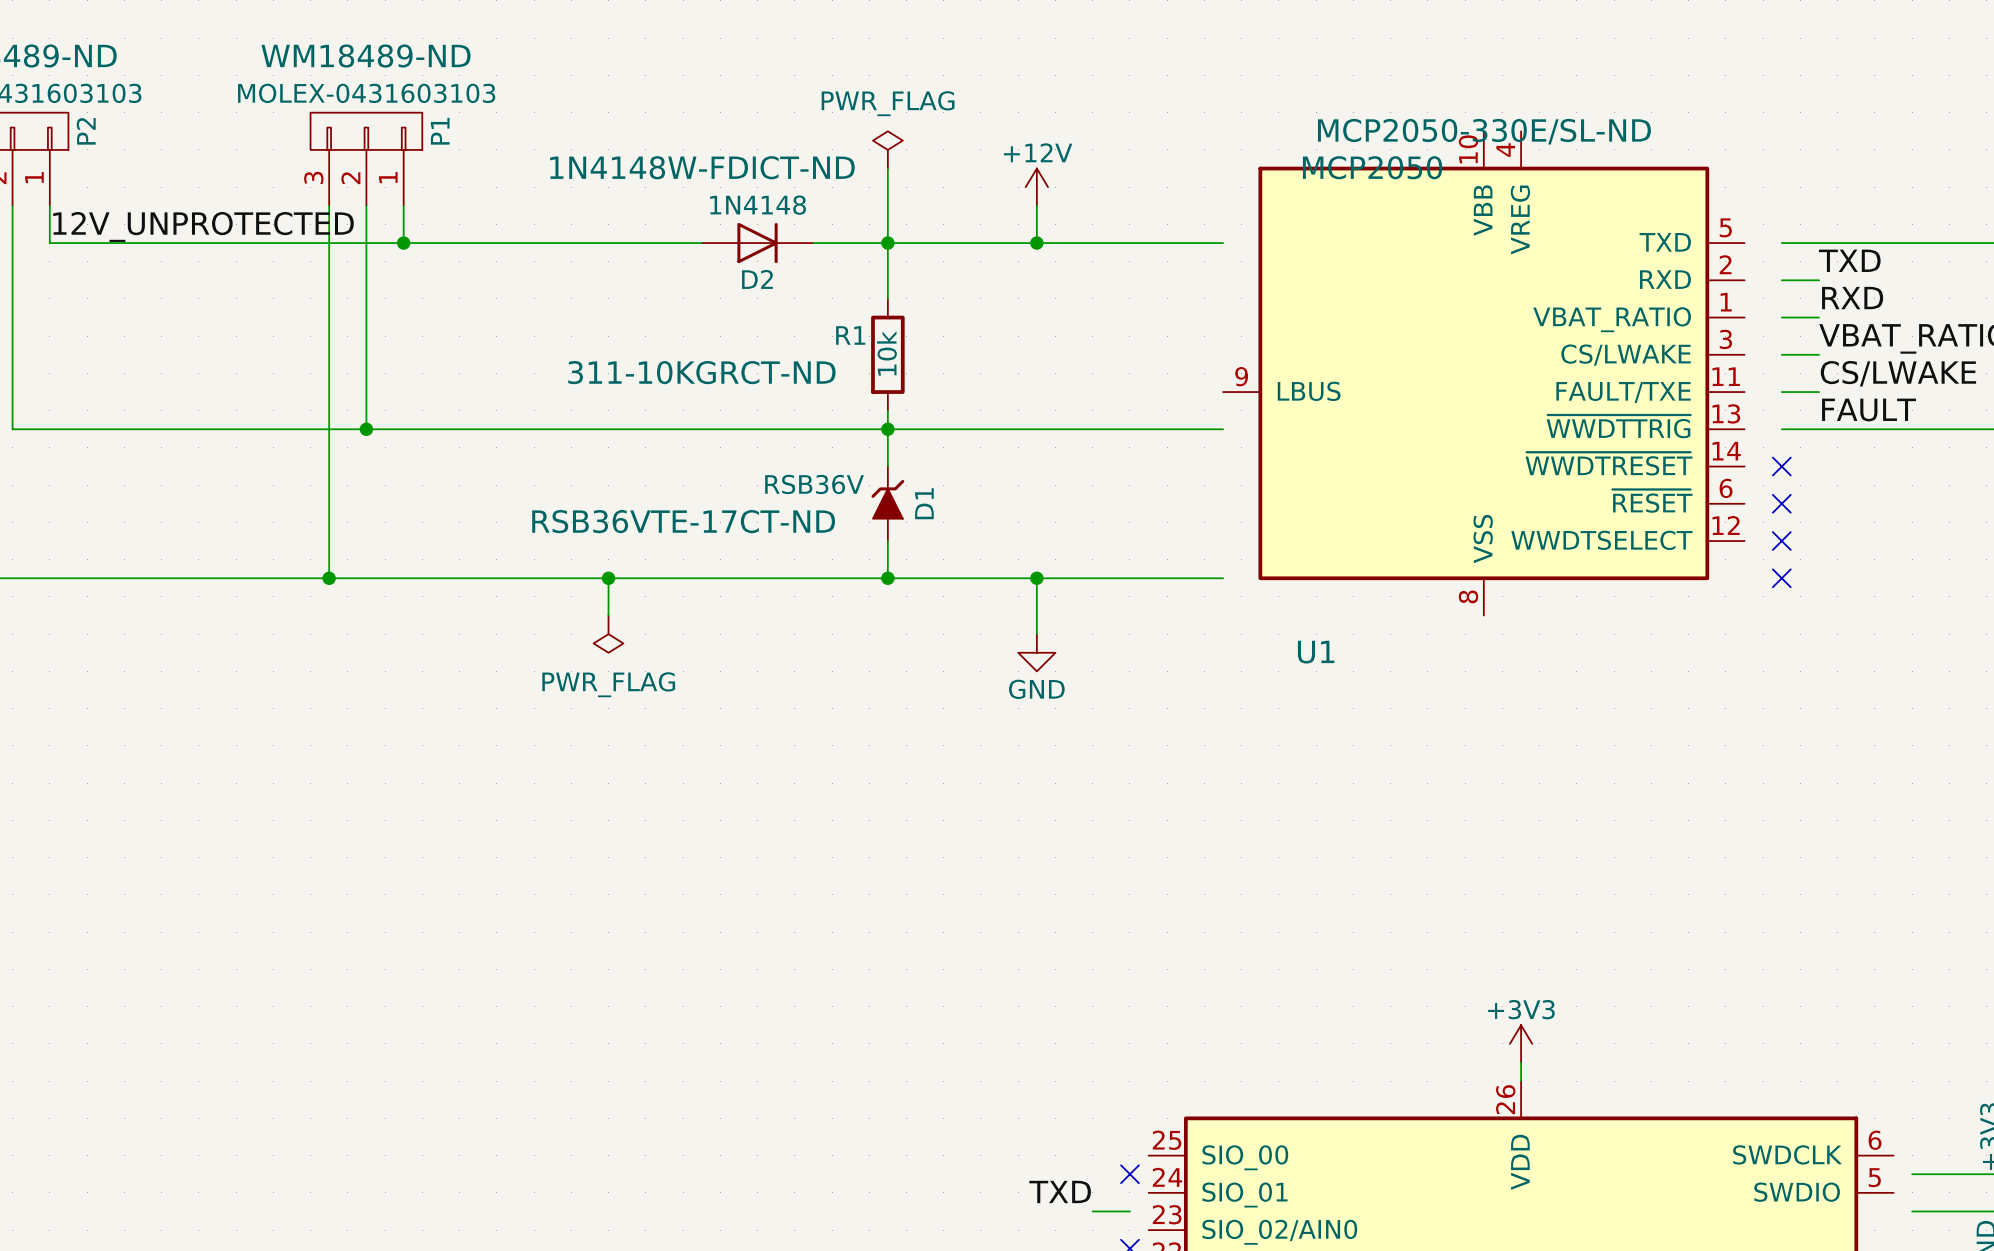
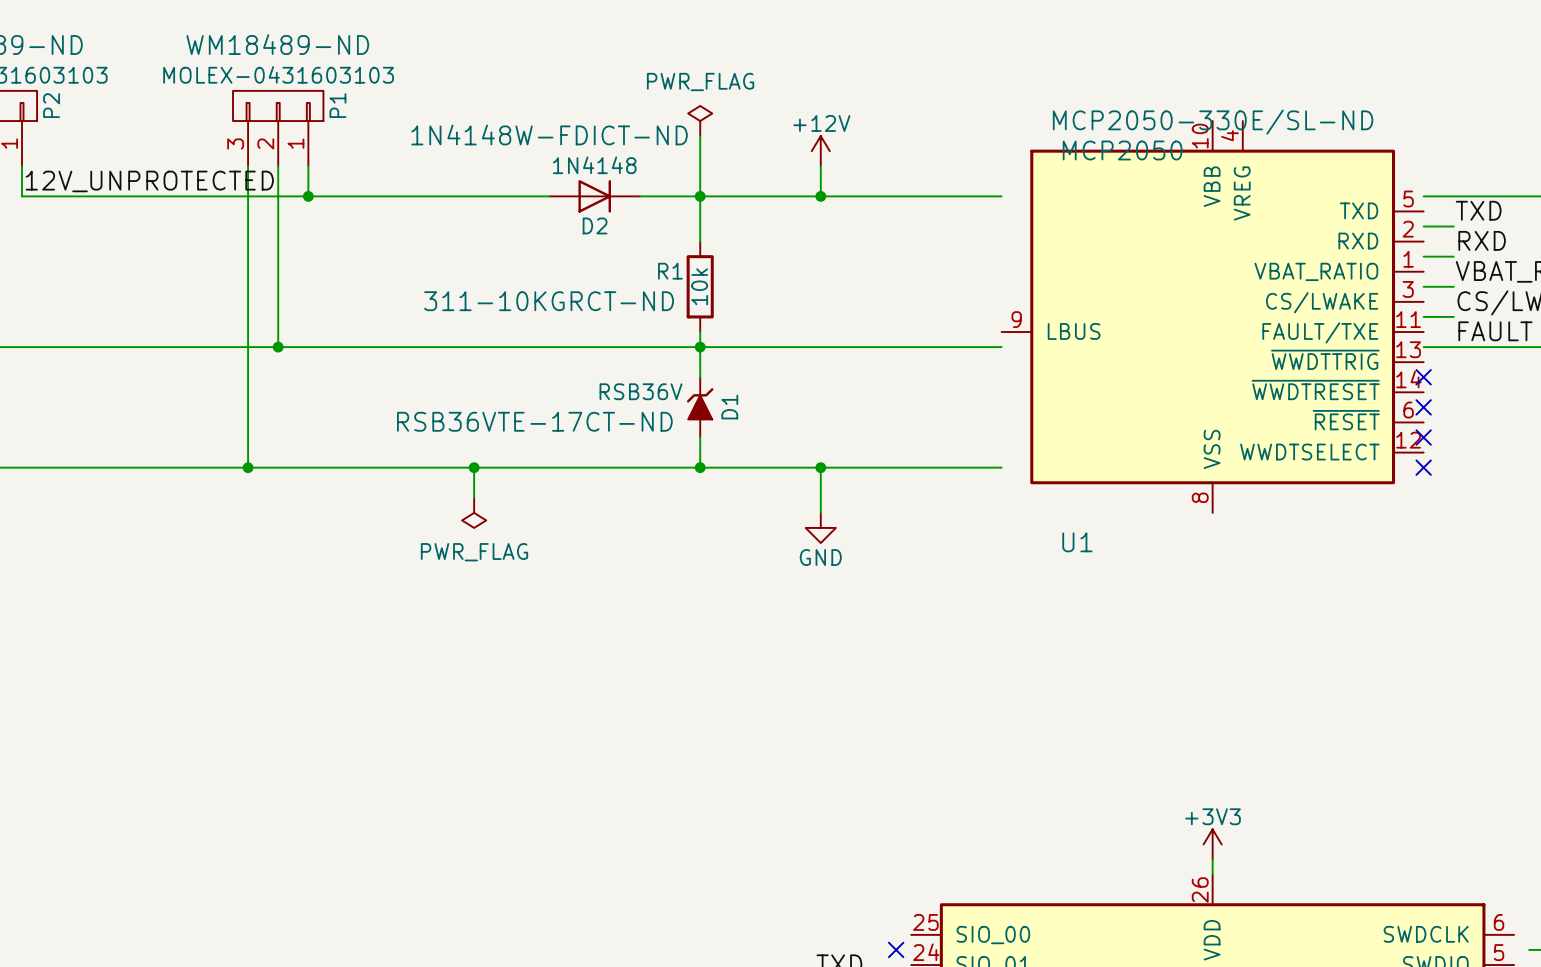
wire: none -> (971, 196) (1001, 196)
U1 position: (1483, 373) -> (1212, 316)
wire: none -> (971, 347) (1001, 347)
wire: none -> (971, 467) (1001, 467)

